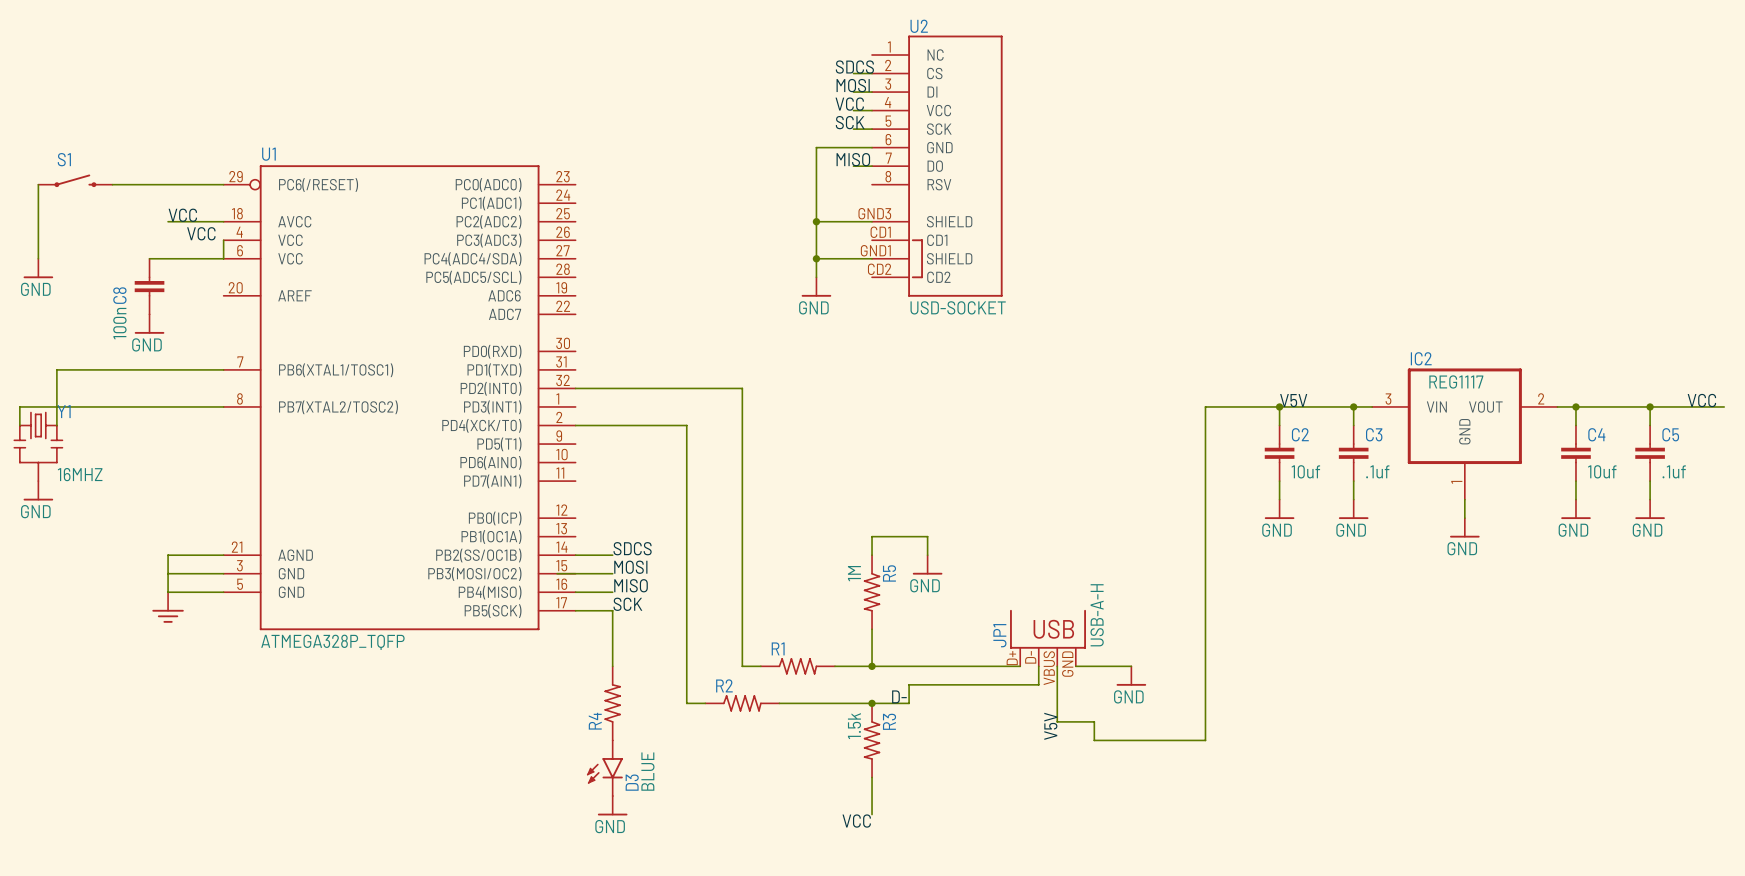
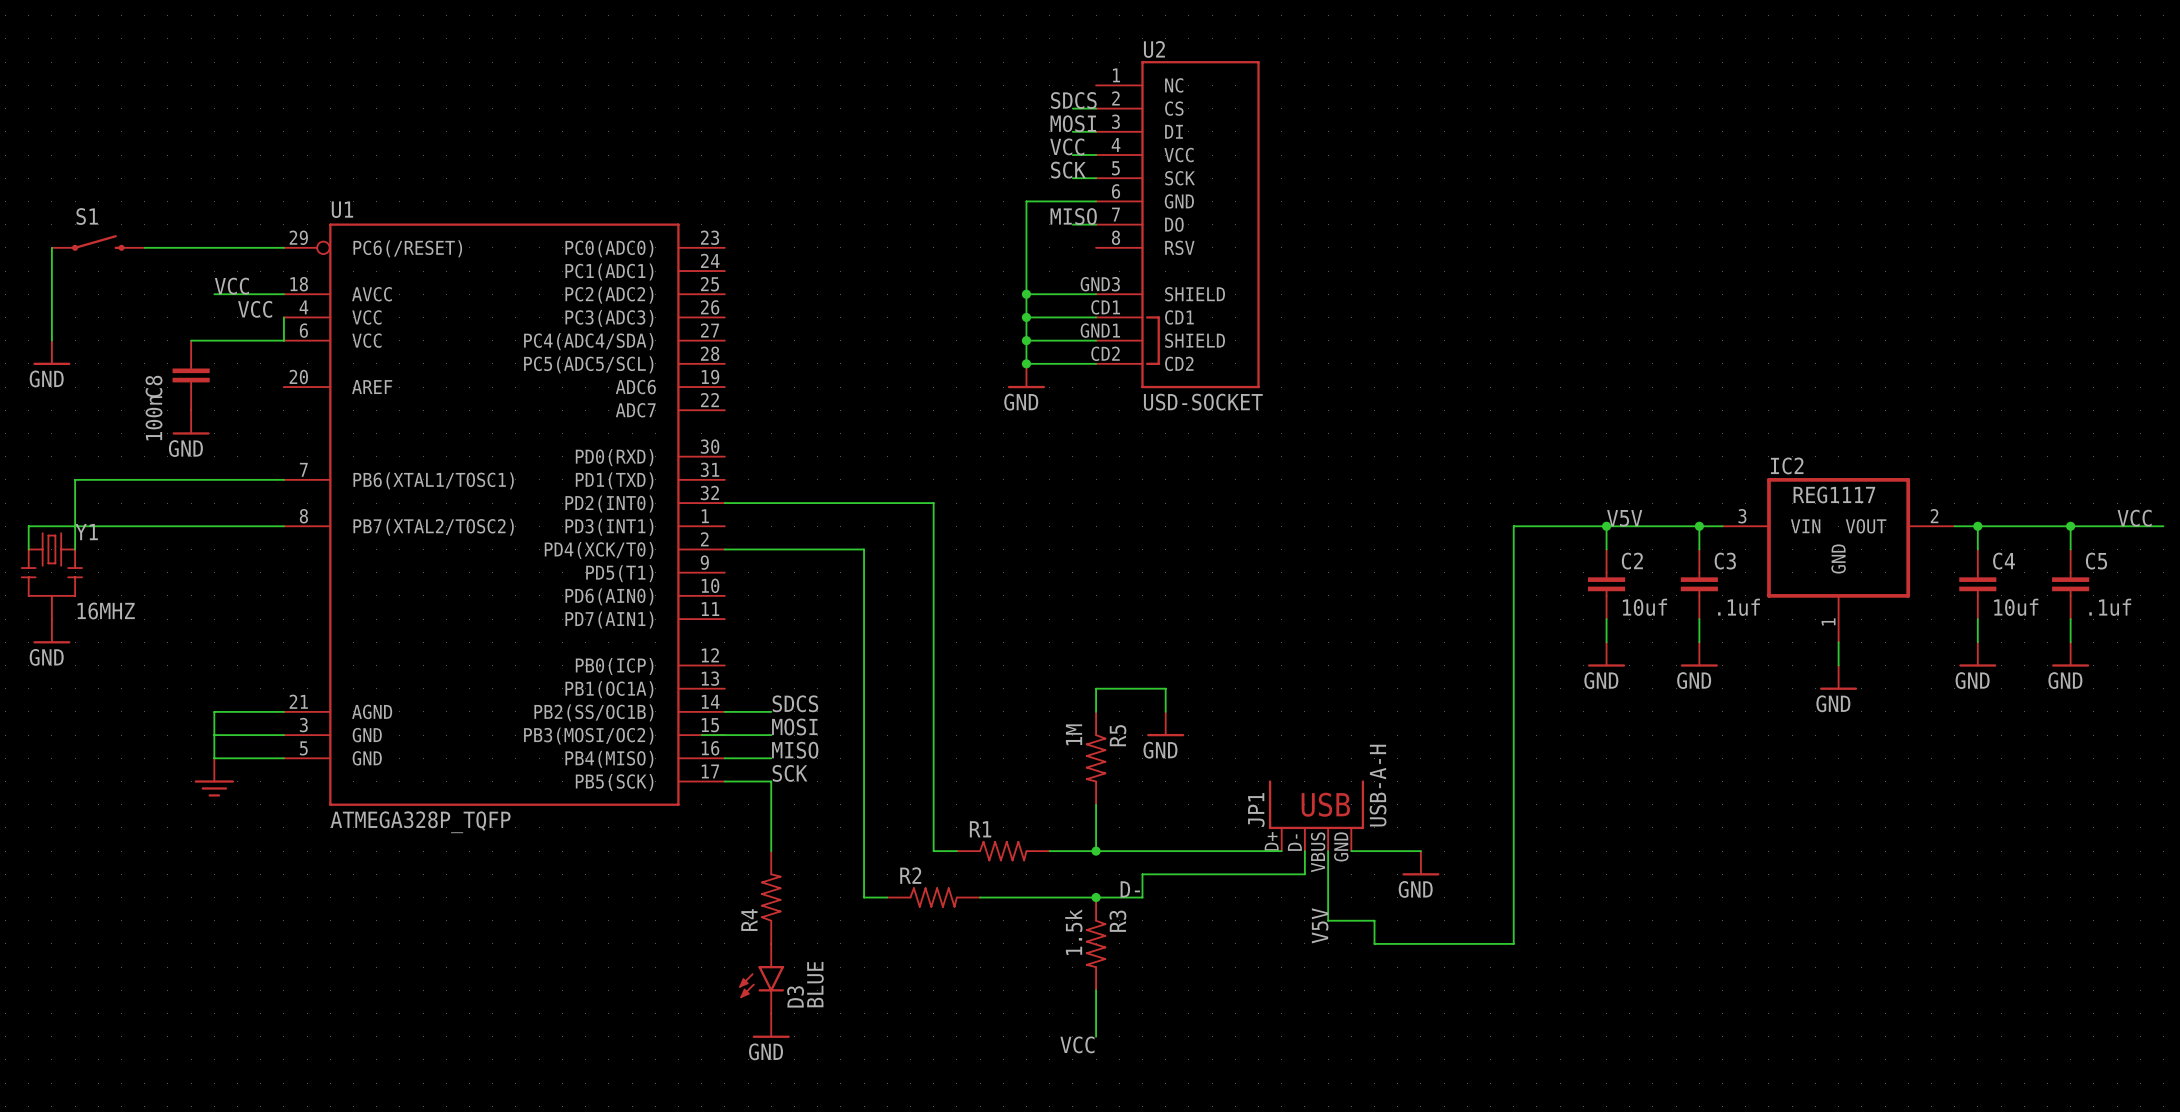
wire: none -> (1026, 317) (1096, 317)
junction: none -> (1026, 317)
wire: none -> (1026, 363) (1096, 363)
junction: none -> (1026, 363)

